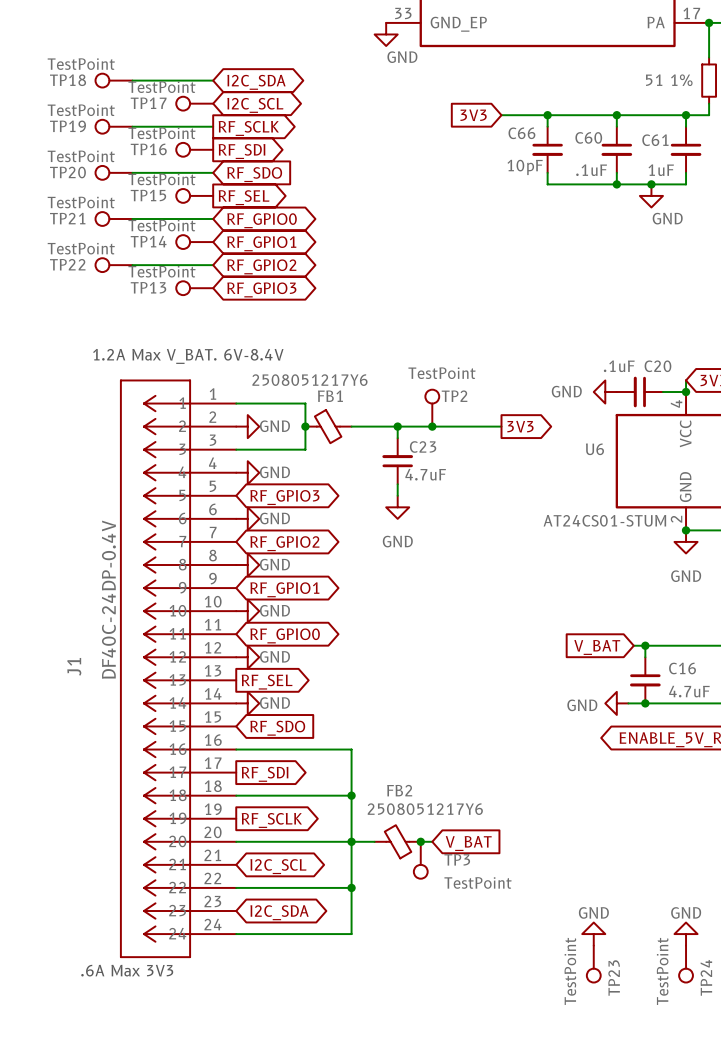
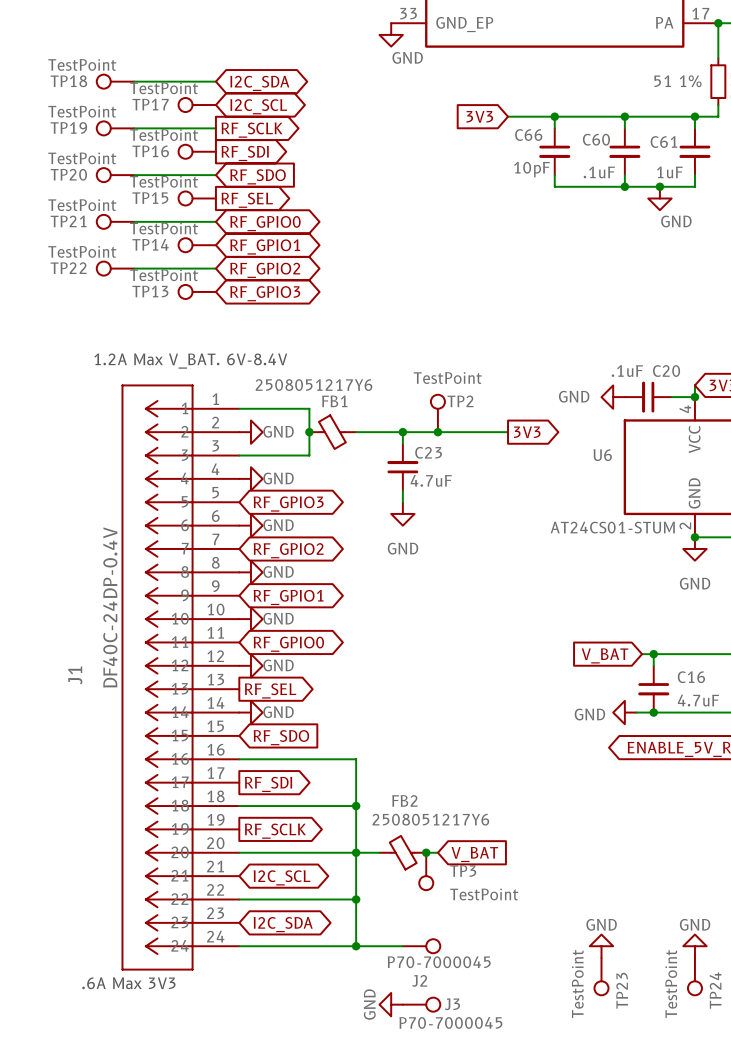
wire: none -> (356, 946) (402, 946)
junction: none -> (356, 946)
J2: none -> P70-7000045 (421, 946)
power symbol: none -> GND (391, 1004)
J3: none -> P70-7000045 (421, 1004)

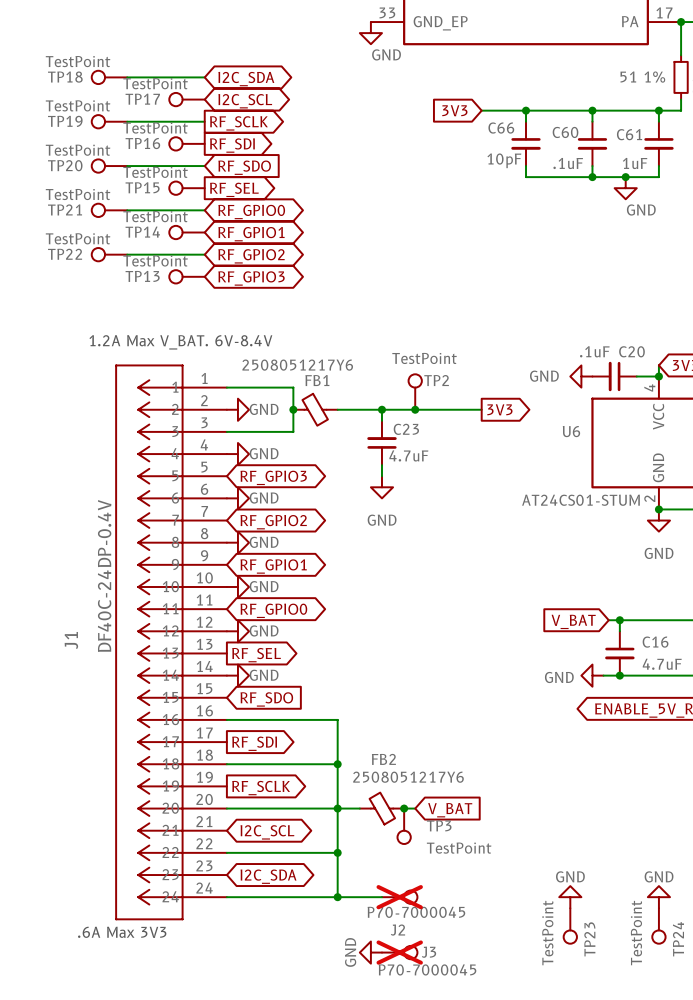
J2 do-not-place cross: none -> (399, 897)
J3 do-not-place cross: none -> (399, 952)

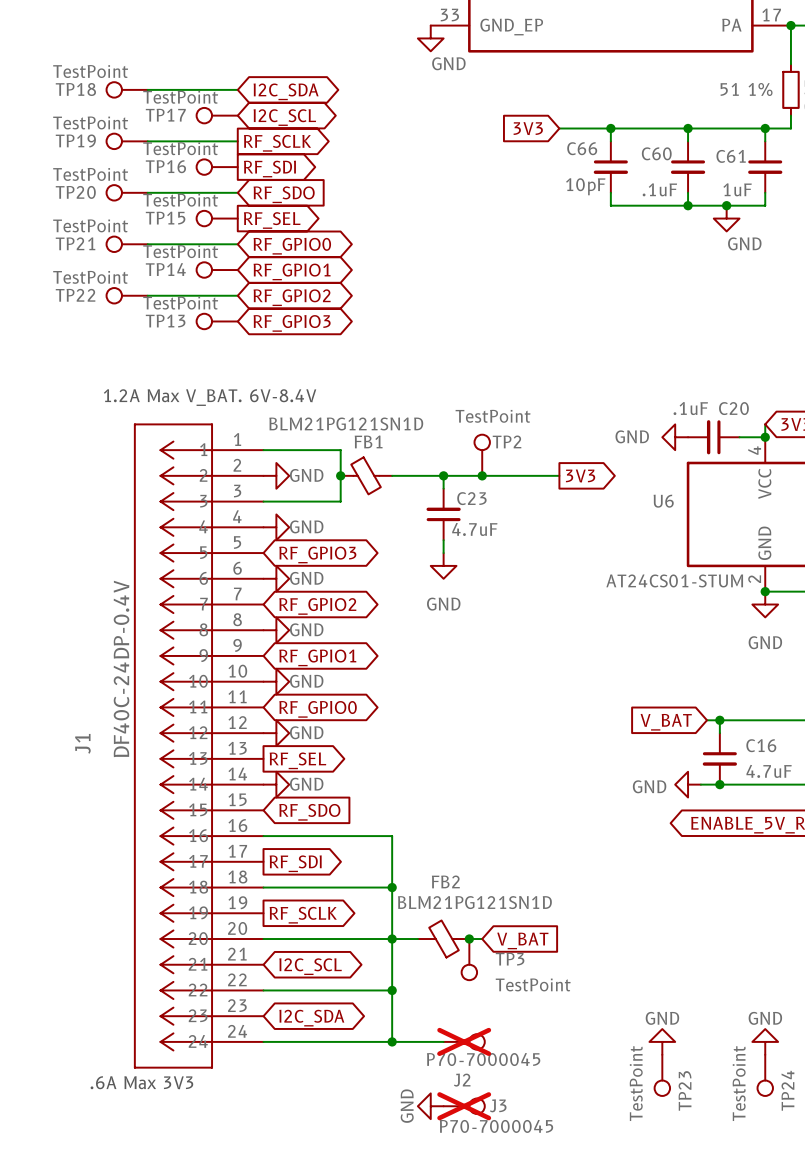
FB1 value: 2508051217Y6 (297, 365) -> BLM21PG121SN1D (346, 423)
FB2 value: 2508051217Y6 (408, 777) -> BLM21PG121SN1D (474, 902)

